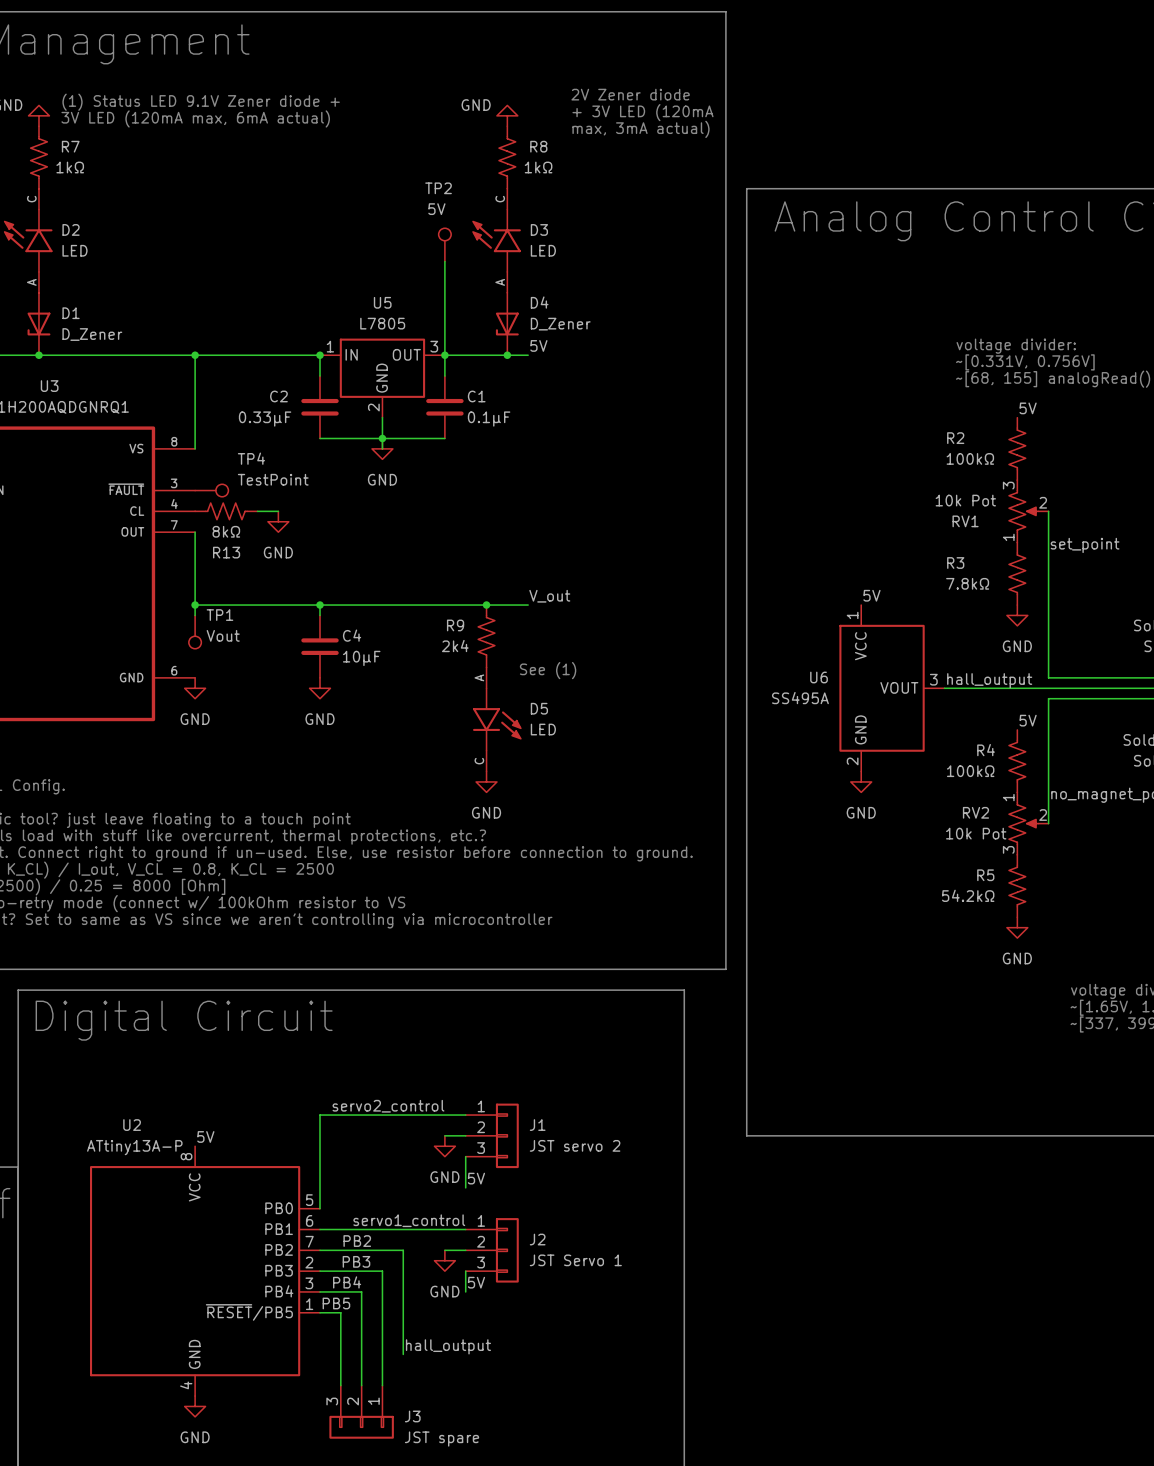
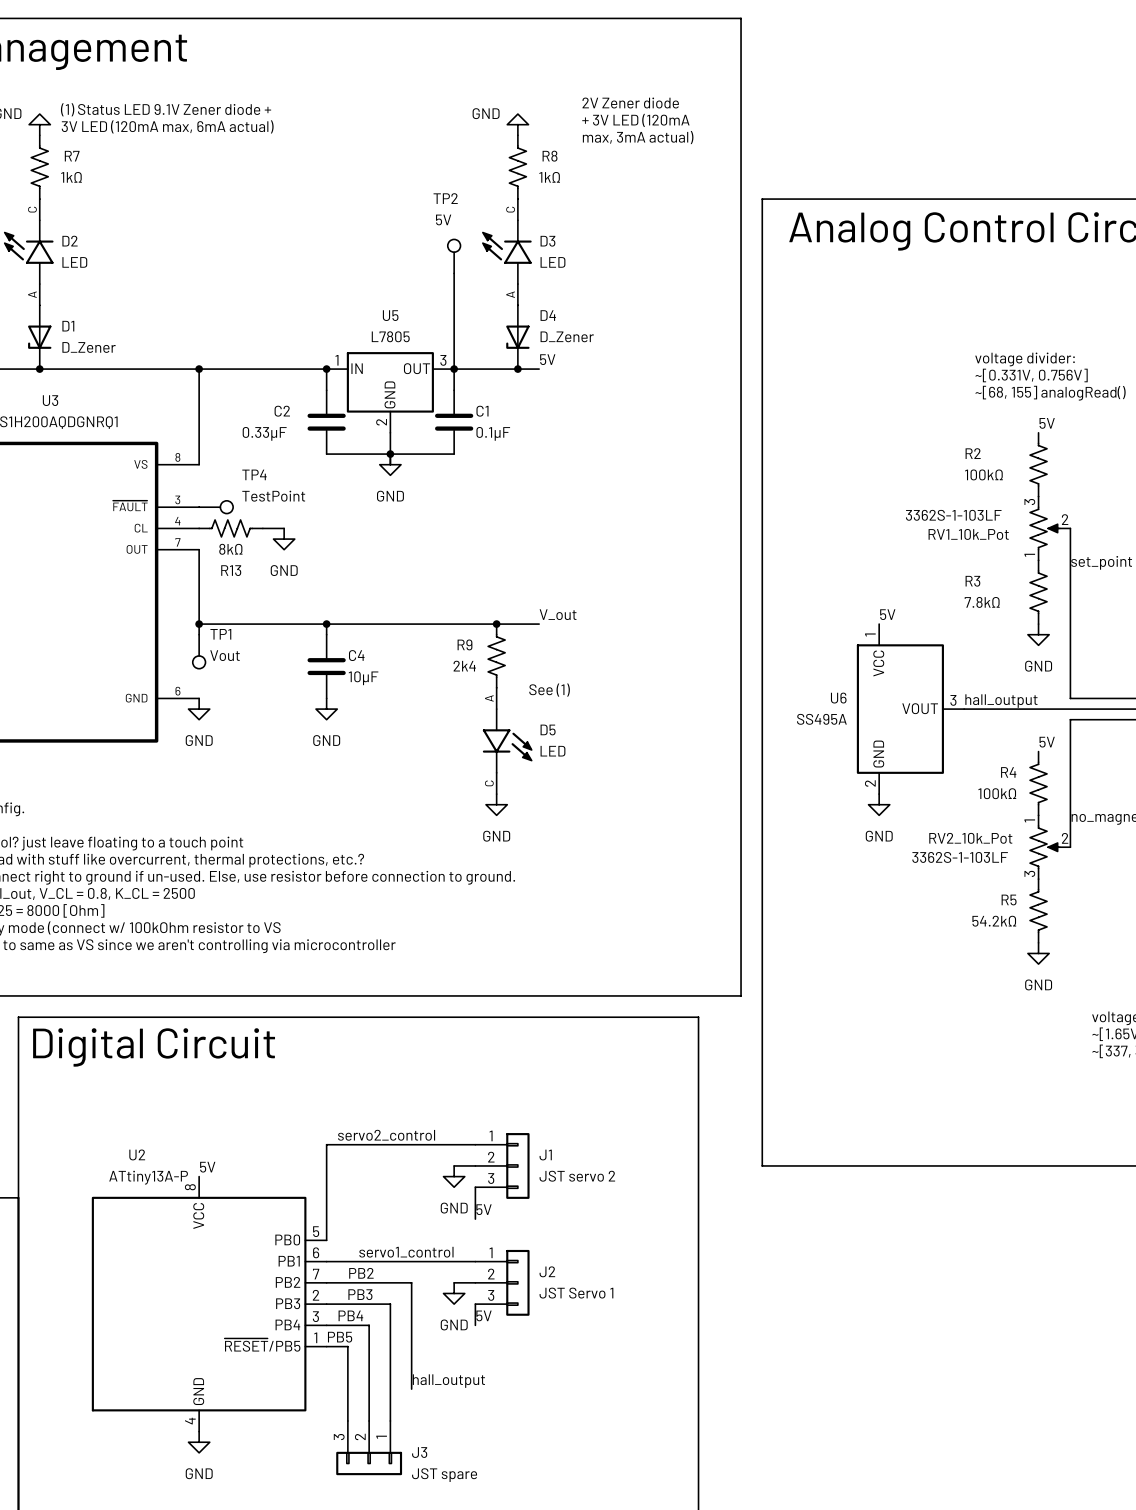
RV1 value: 10k Pot (965, 500) -> 3362S-1-103LF (953, 515)
RV1 name: RV1 (965, 521) -> RV1_10k_Pot (968, 534)
RV2 name: RV2 (975, 812) -> RV2_10k_Pot (970, 838)
RV2 value: 10k Pot (976, 833) -> 3362S-1-103LF (960, 857)

